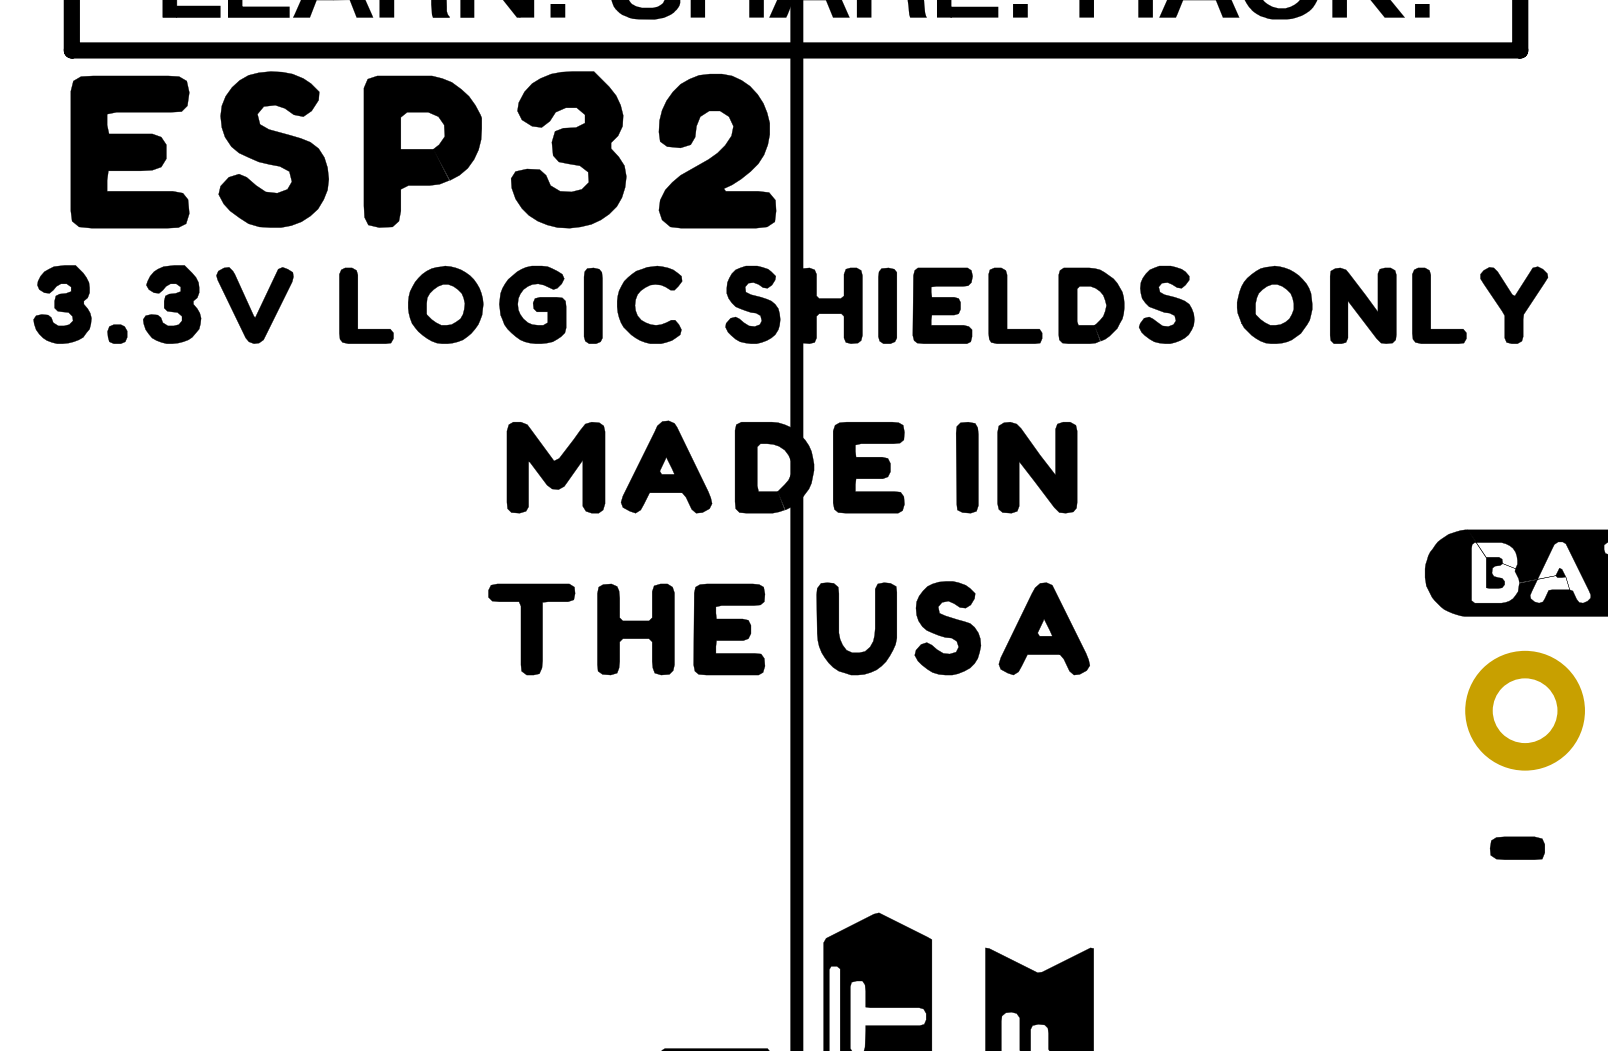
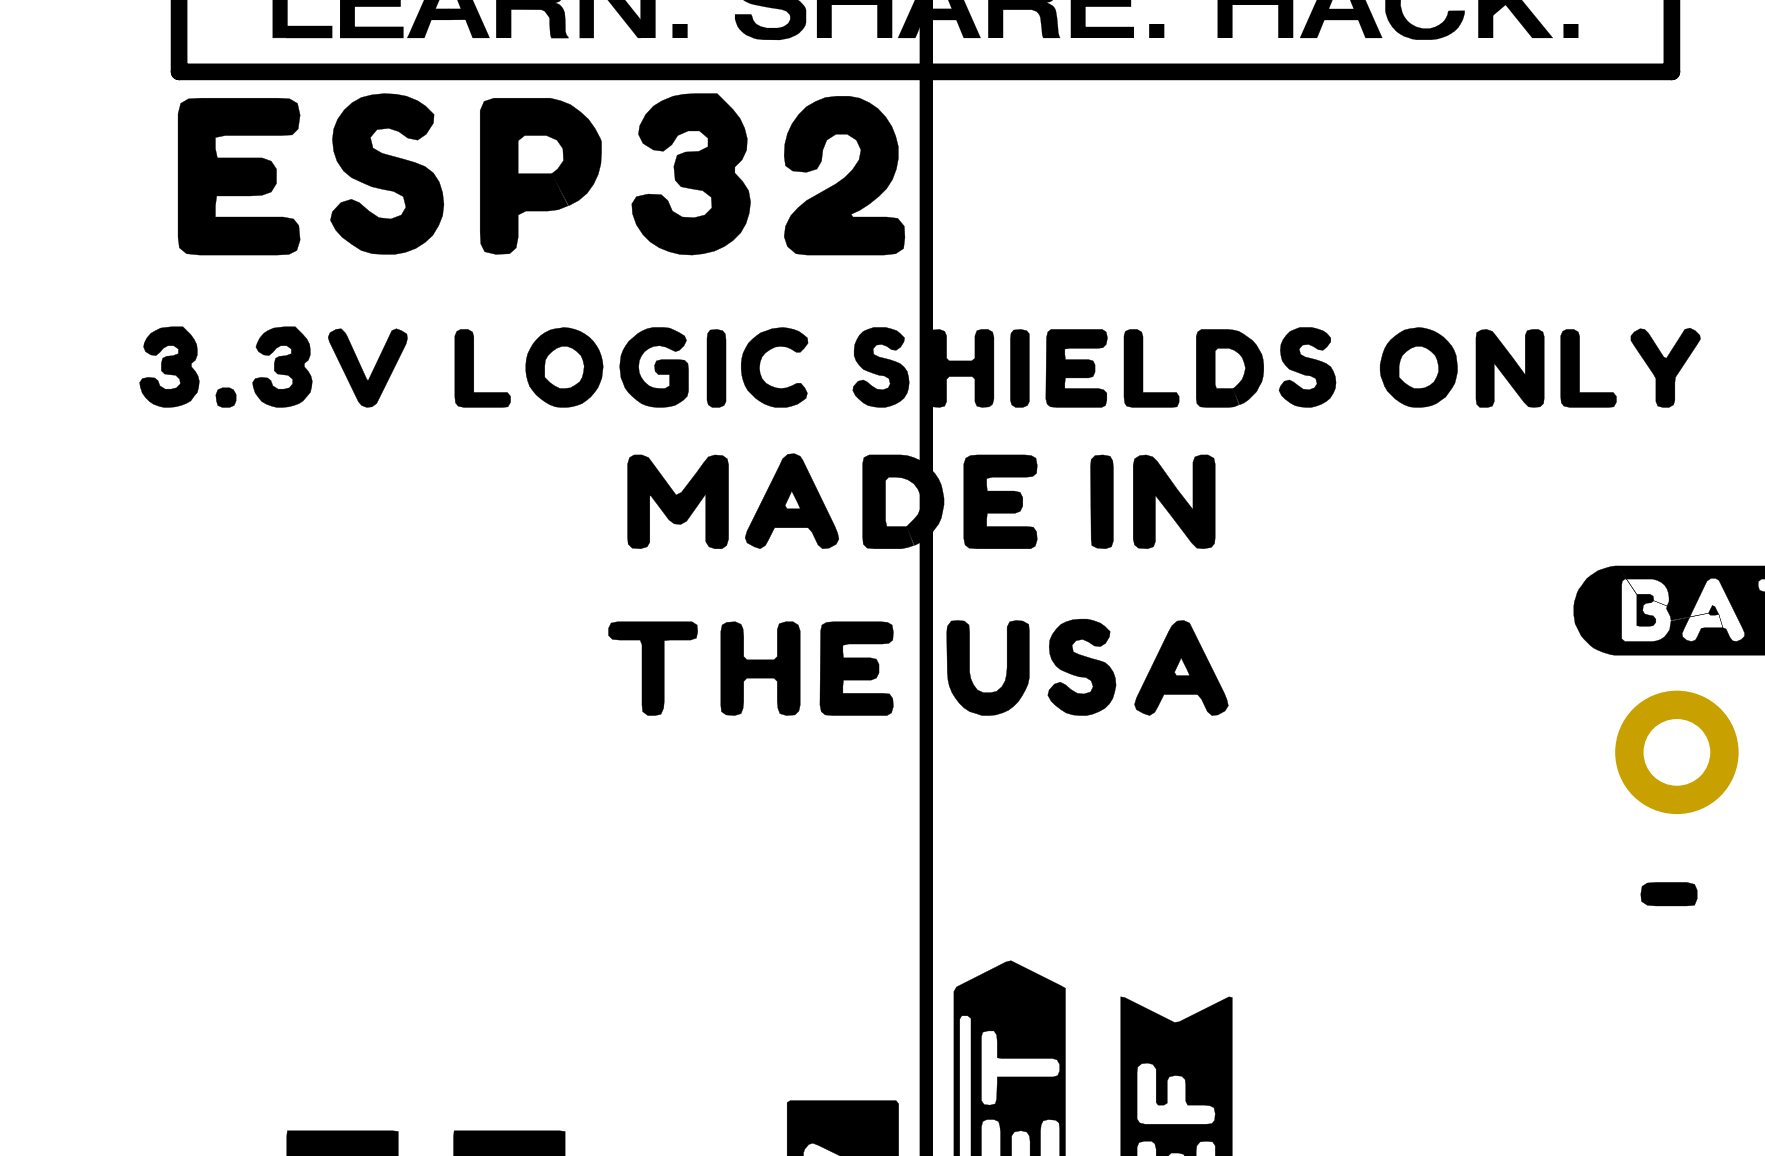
drawing position: (790, 304) -> (920, 367)

